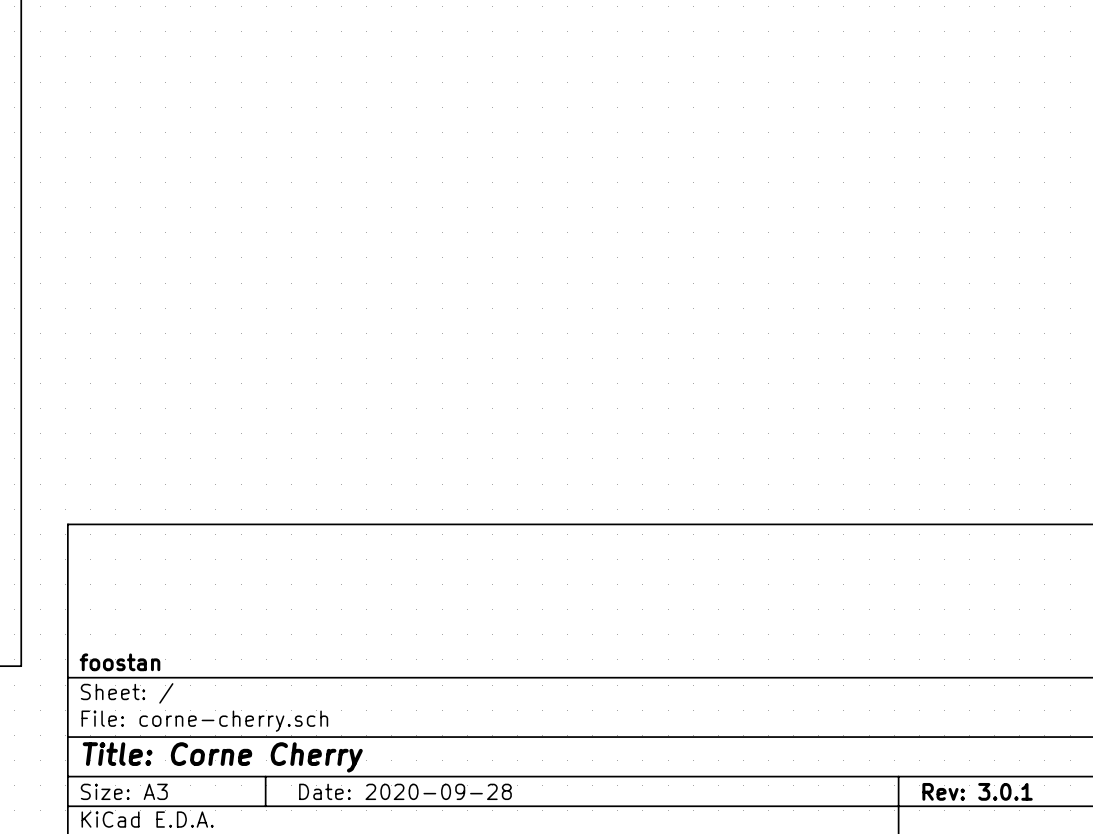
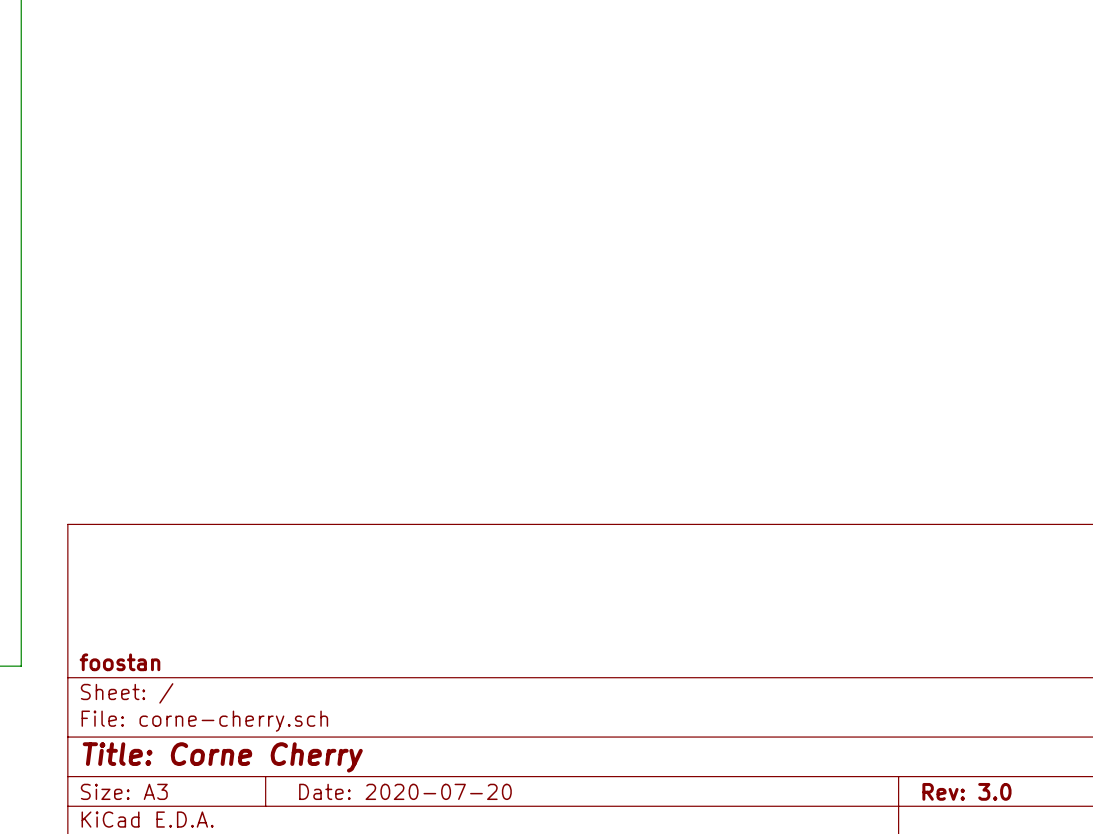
title block: Date: 2020-09-28 (405, 791) -> Date: 2020-07-20 (405, 791)
title block: Rev: 3.0.1 (977, 791) -> Rev: 3.0 (966, 791)

